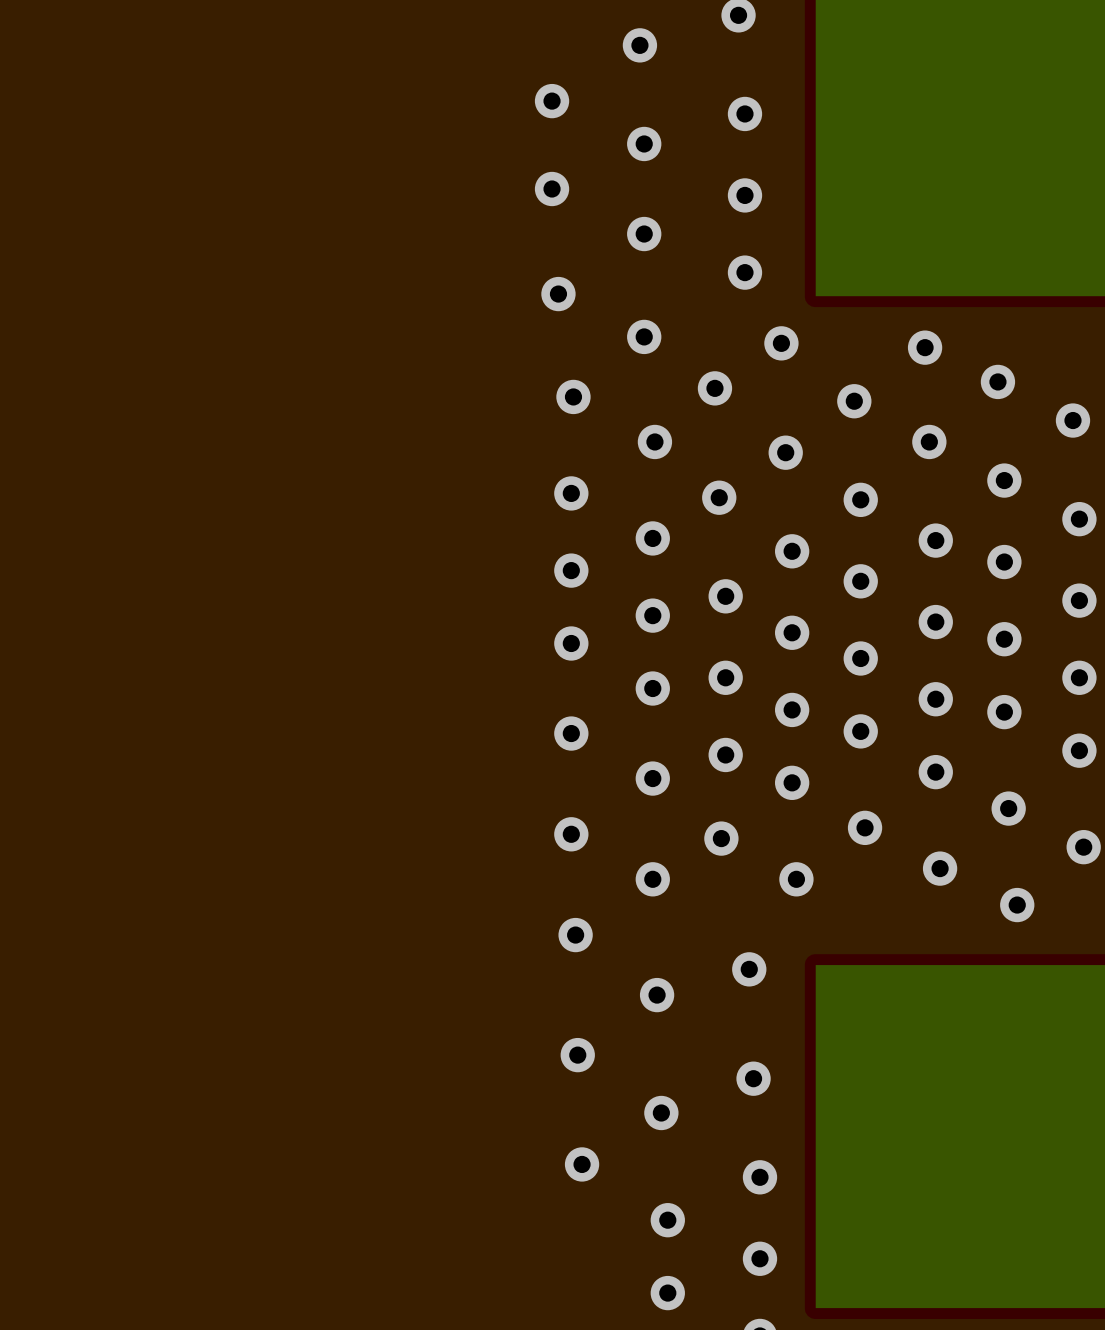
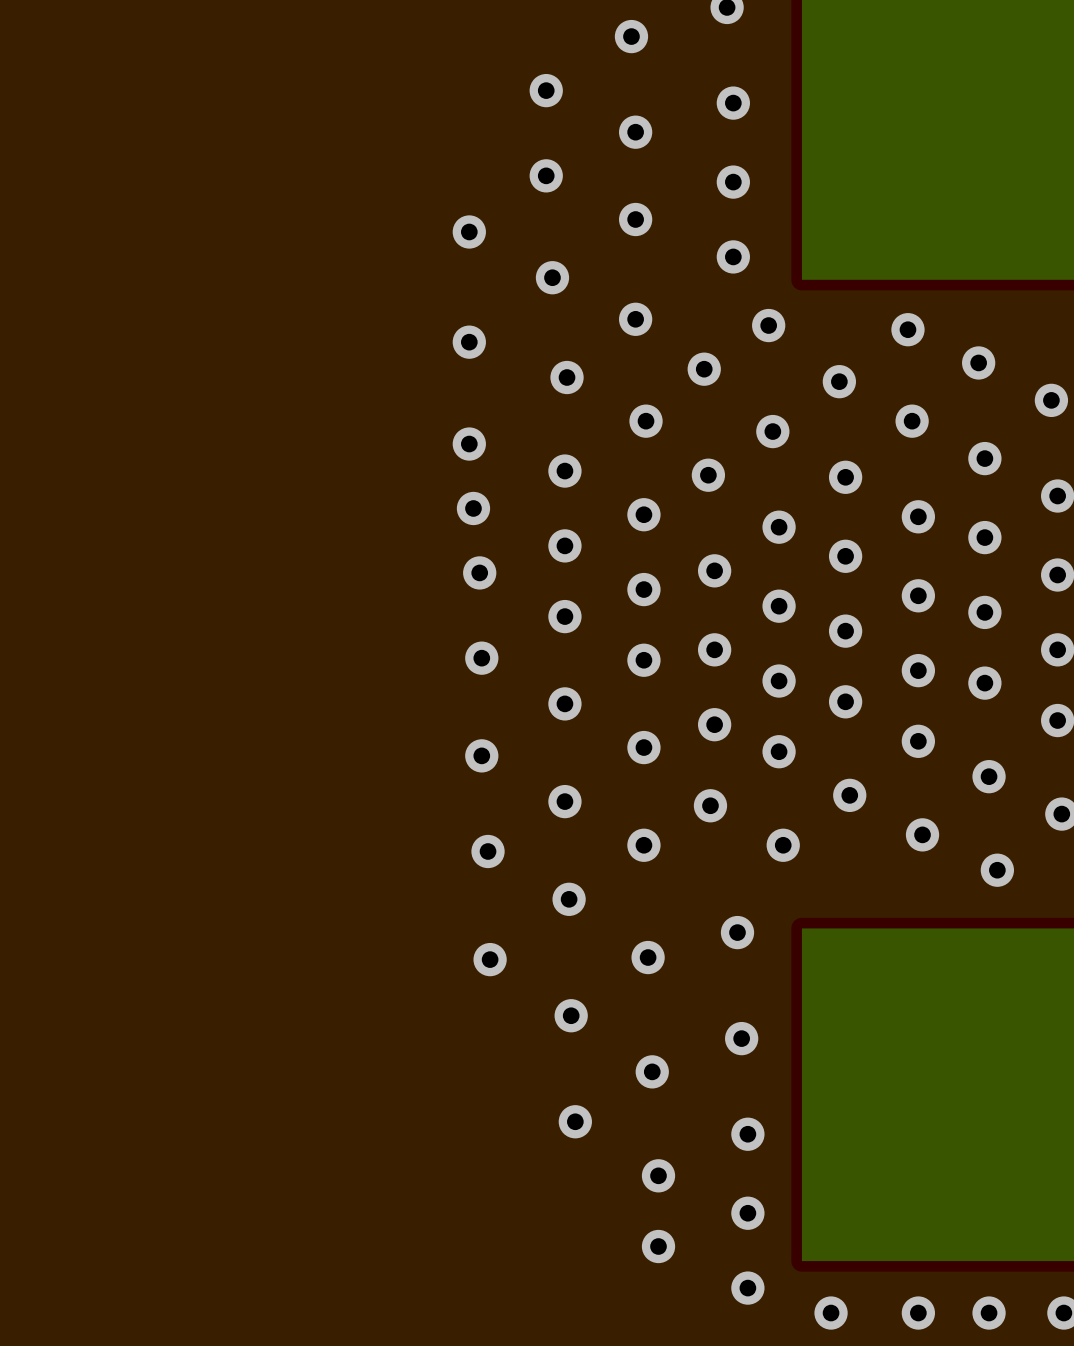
via: none -> (469, 231)
via: none -> (469, 342)
via: none -> (469, 444)
via: none -> (473, 508)
via: none -> (479, 572)
via: none -> (481, 658)
via: none -> (481, 755)
via: none -> (488, 851)
via: none -> (490, 959)

